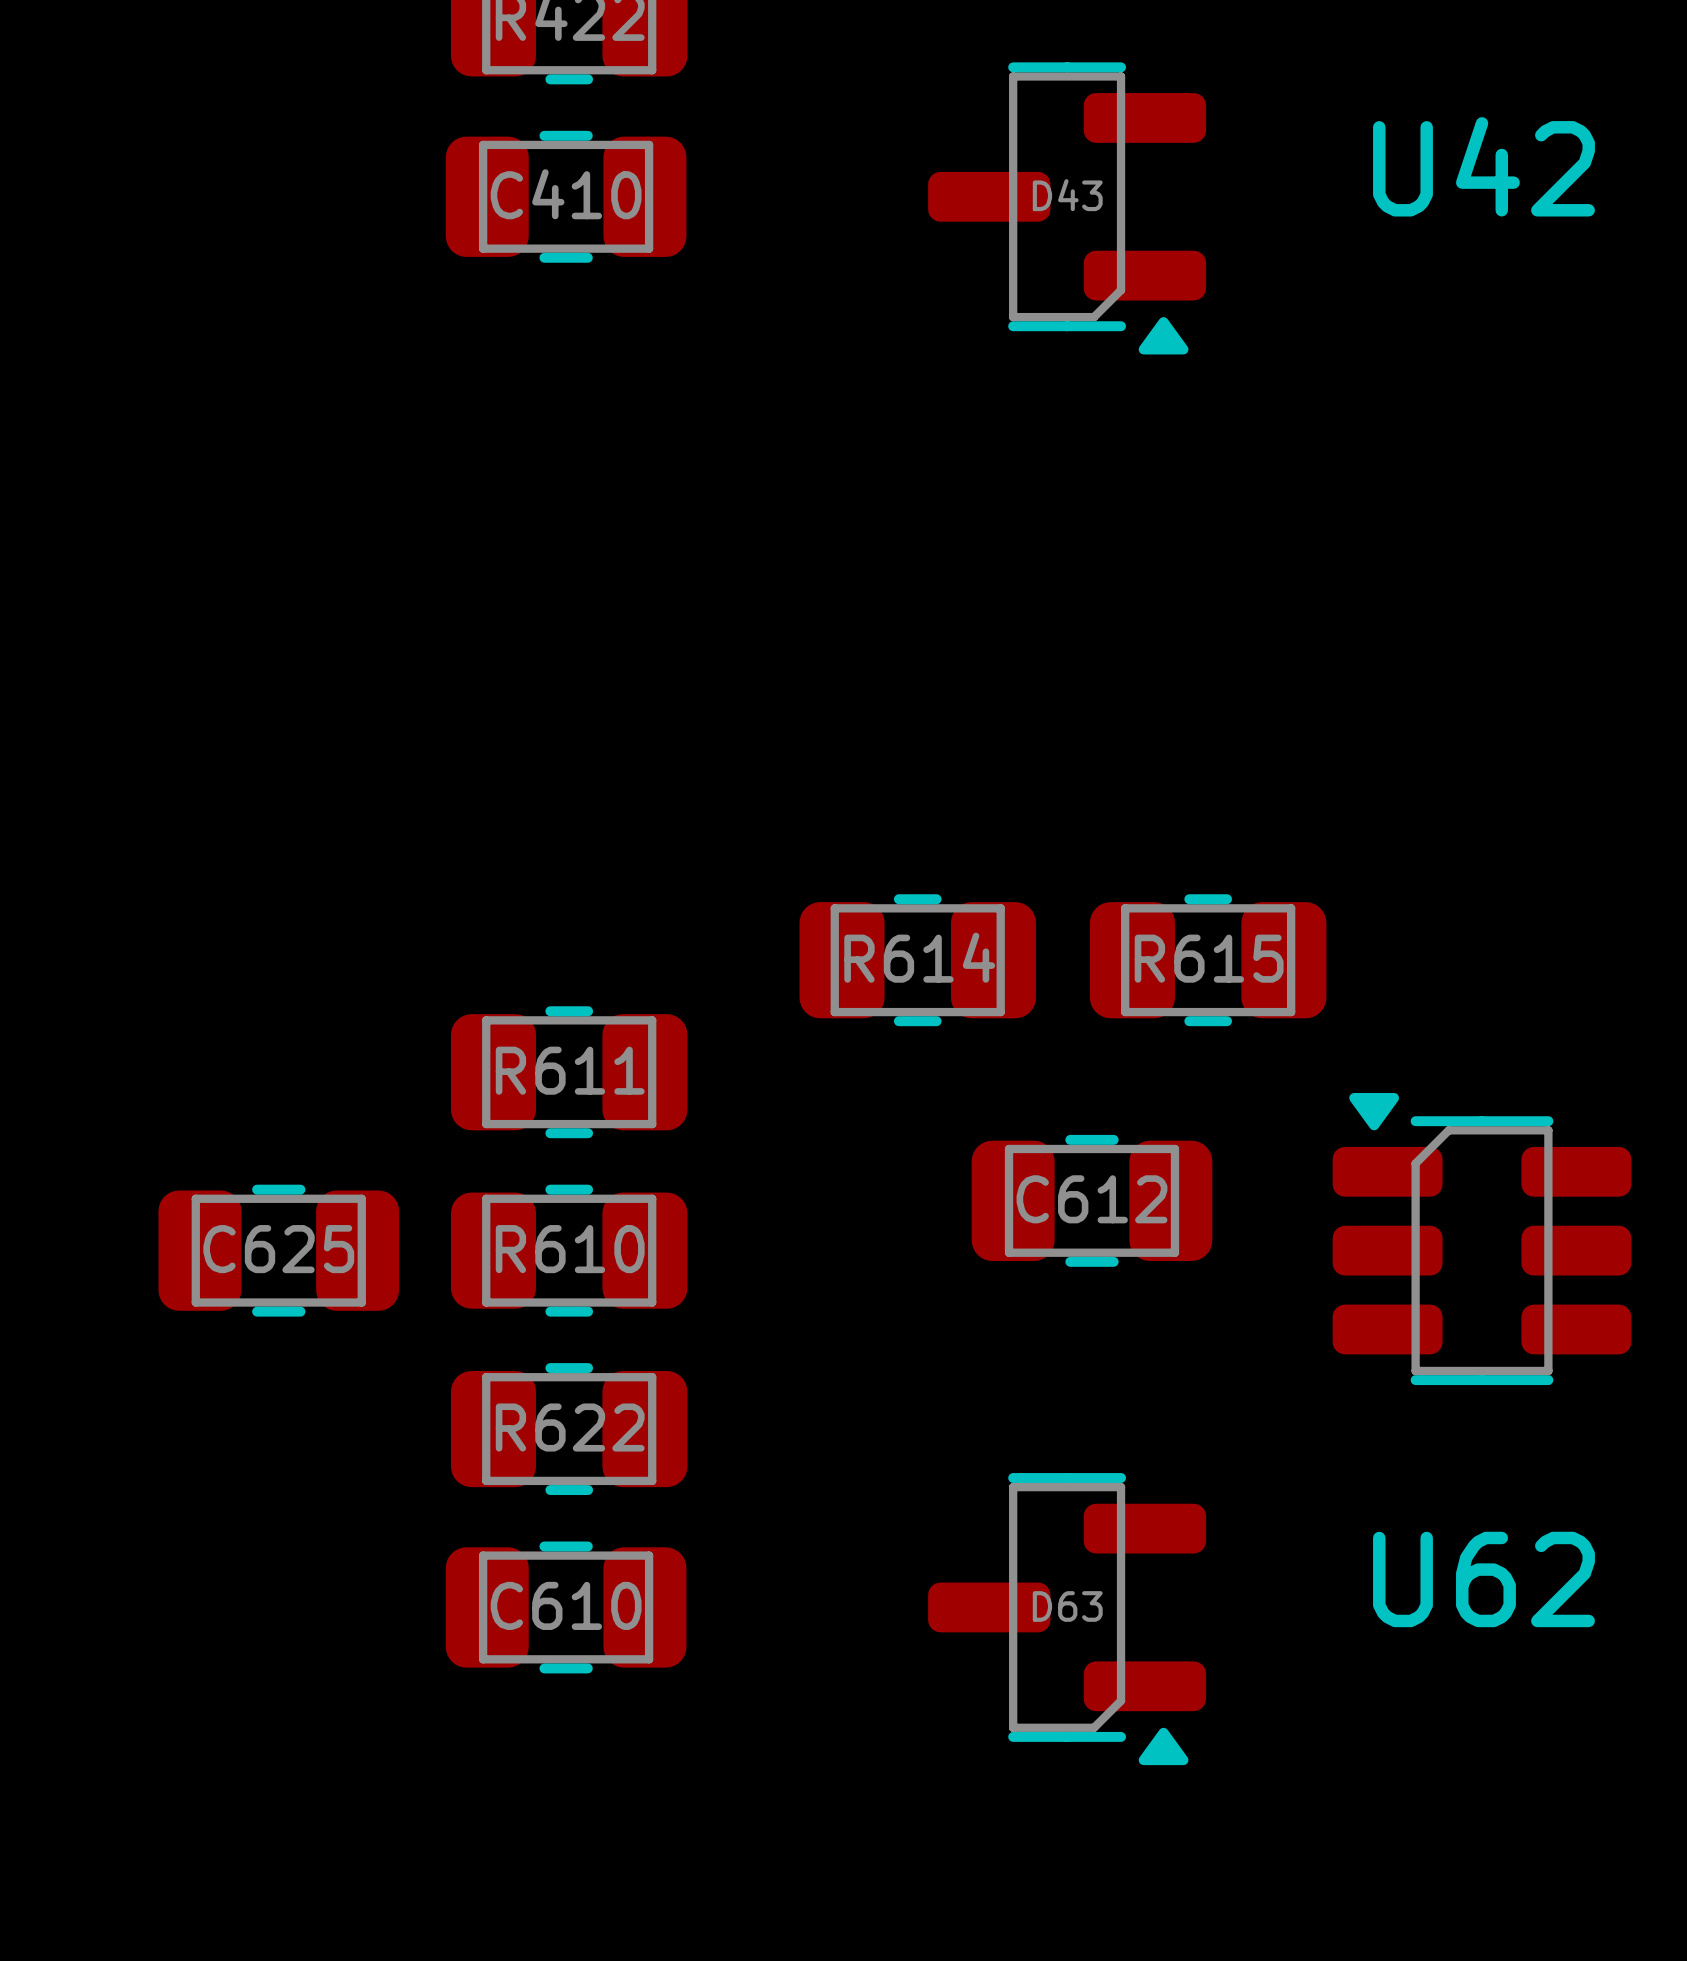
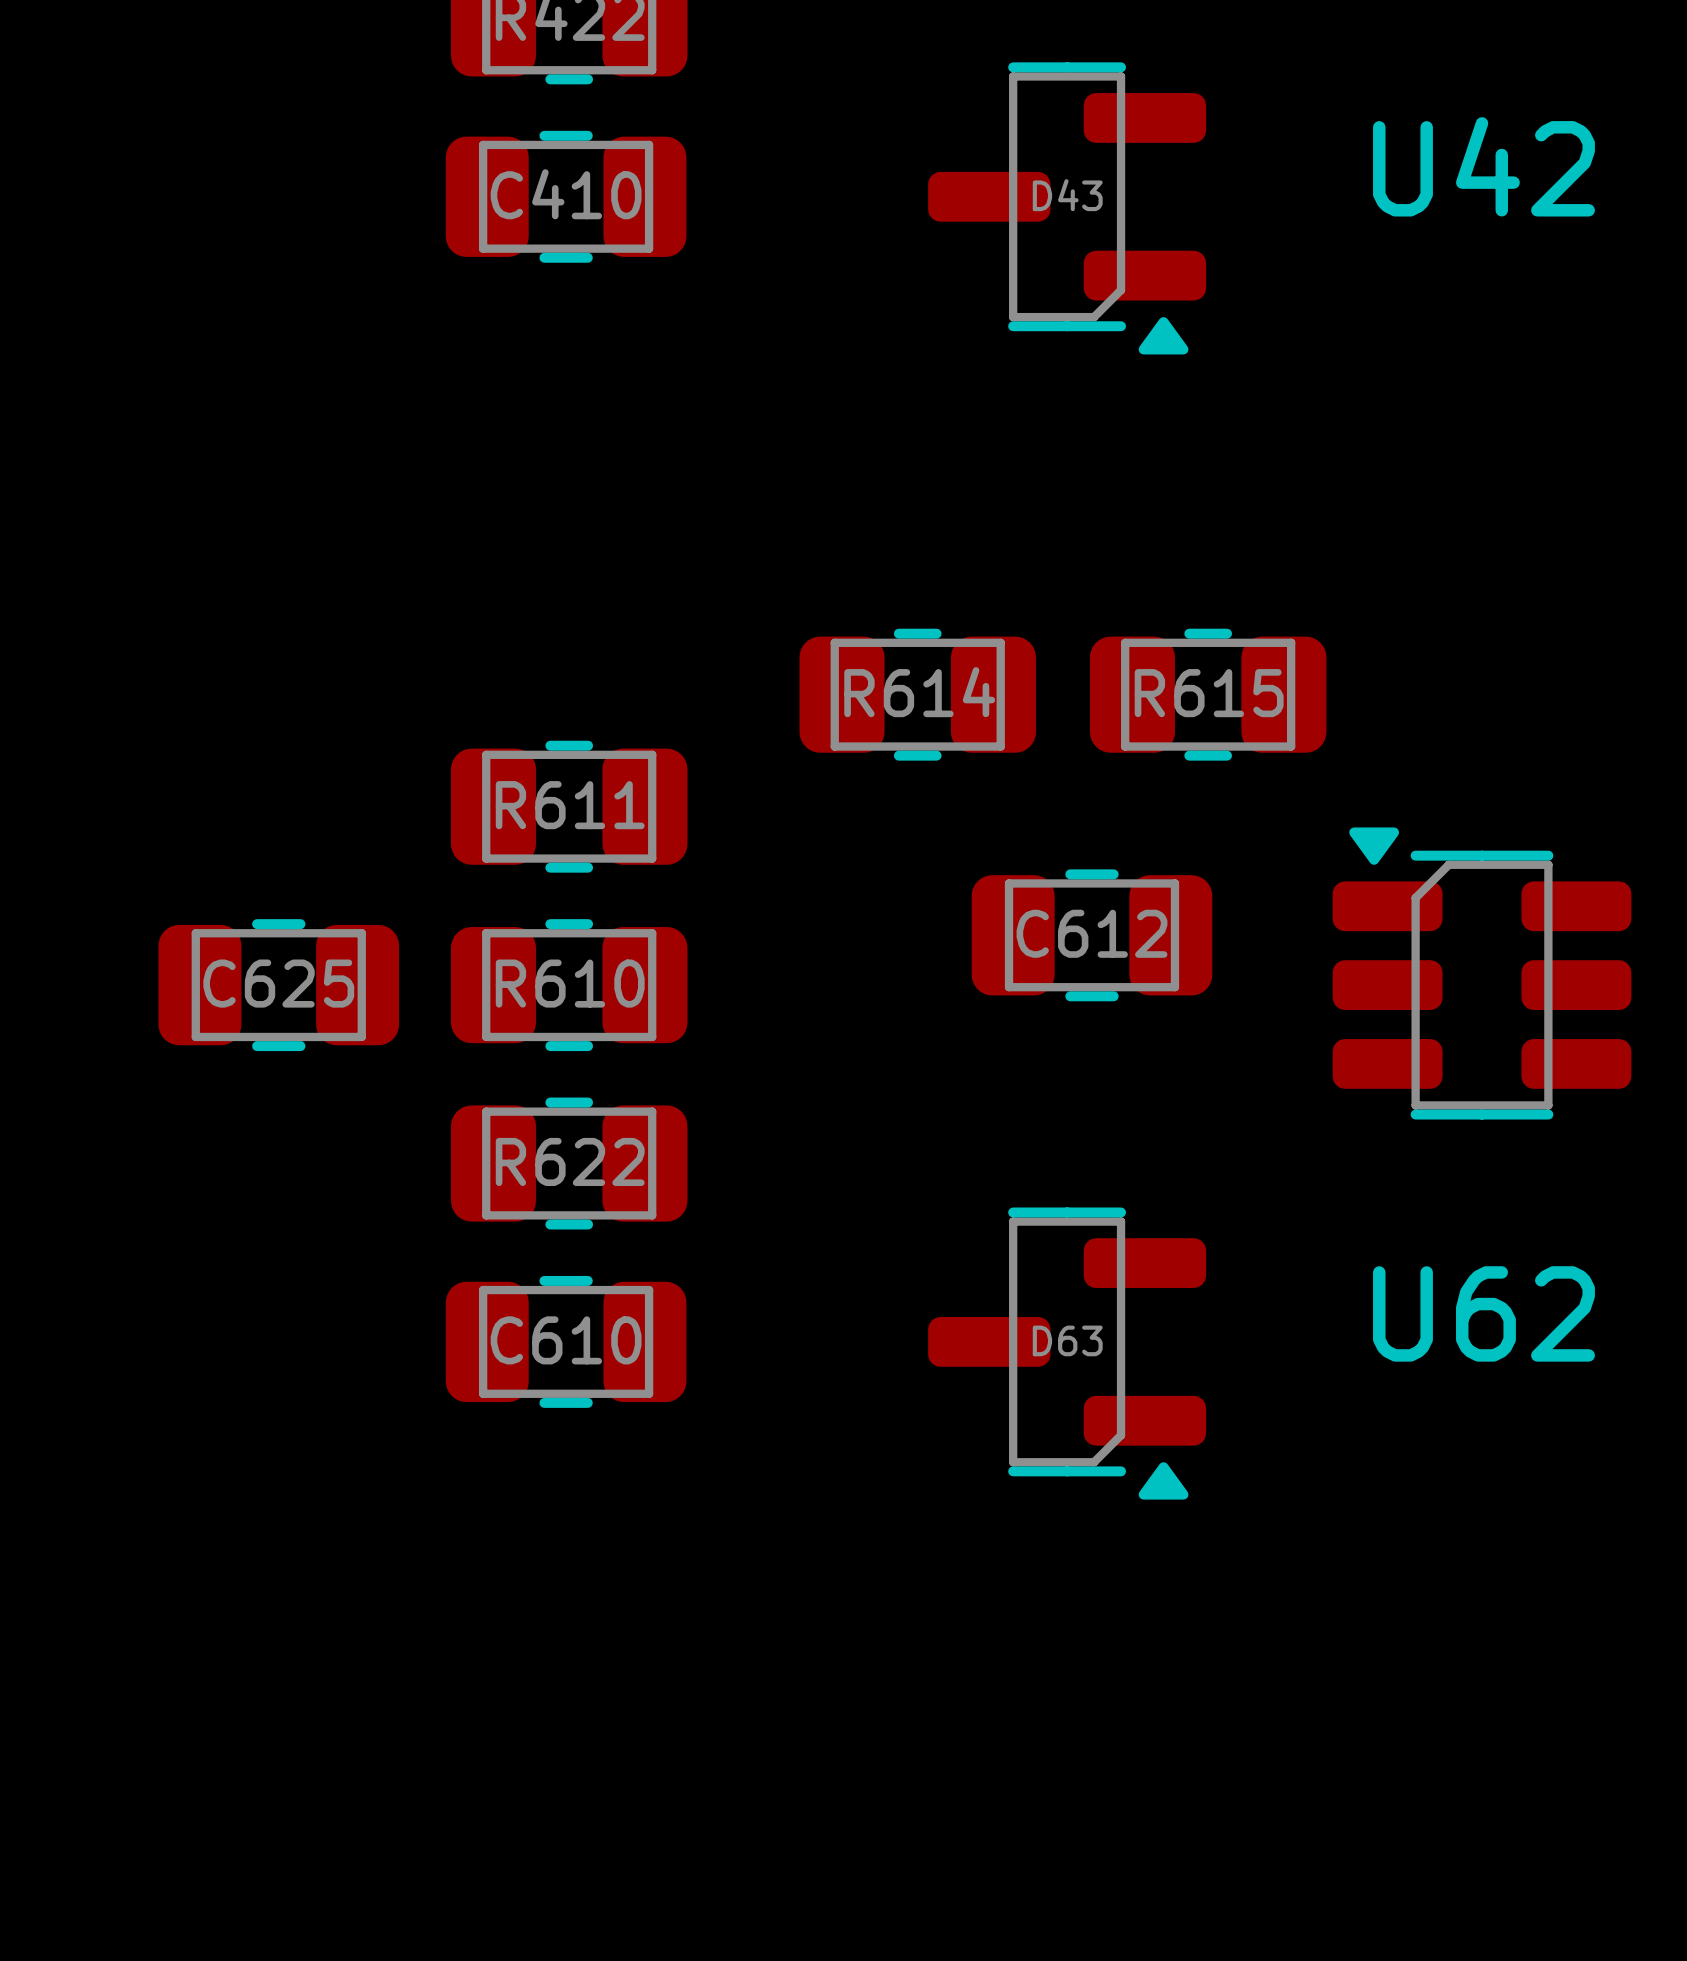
R614 position: (917, 960) -> (917, 694)
R615 position: (1208, 960) -> (1208, 694)
R611 position: (569, 1072) -> (569, 806)
C612 position: (1091, 1200) -> (1091, 935)
U62 position: (1482, 1239) -> (1482, 973)
C625 position: (278, 1250) -> (278, 985)
R610 position: (569, 1250) -> (569, 985)
R622 position: (569, 1429) -> (569, 1163)
C610 position: (566, 1607) -> (566, 1341)
D63 position: (1067, 1619) -> (1067, 1353)

